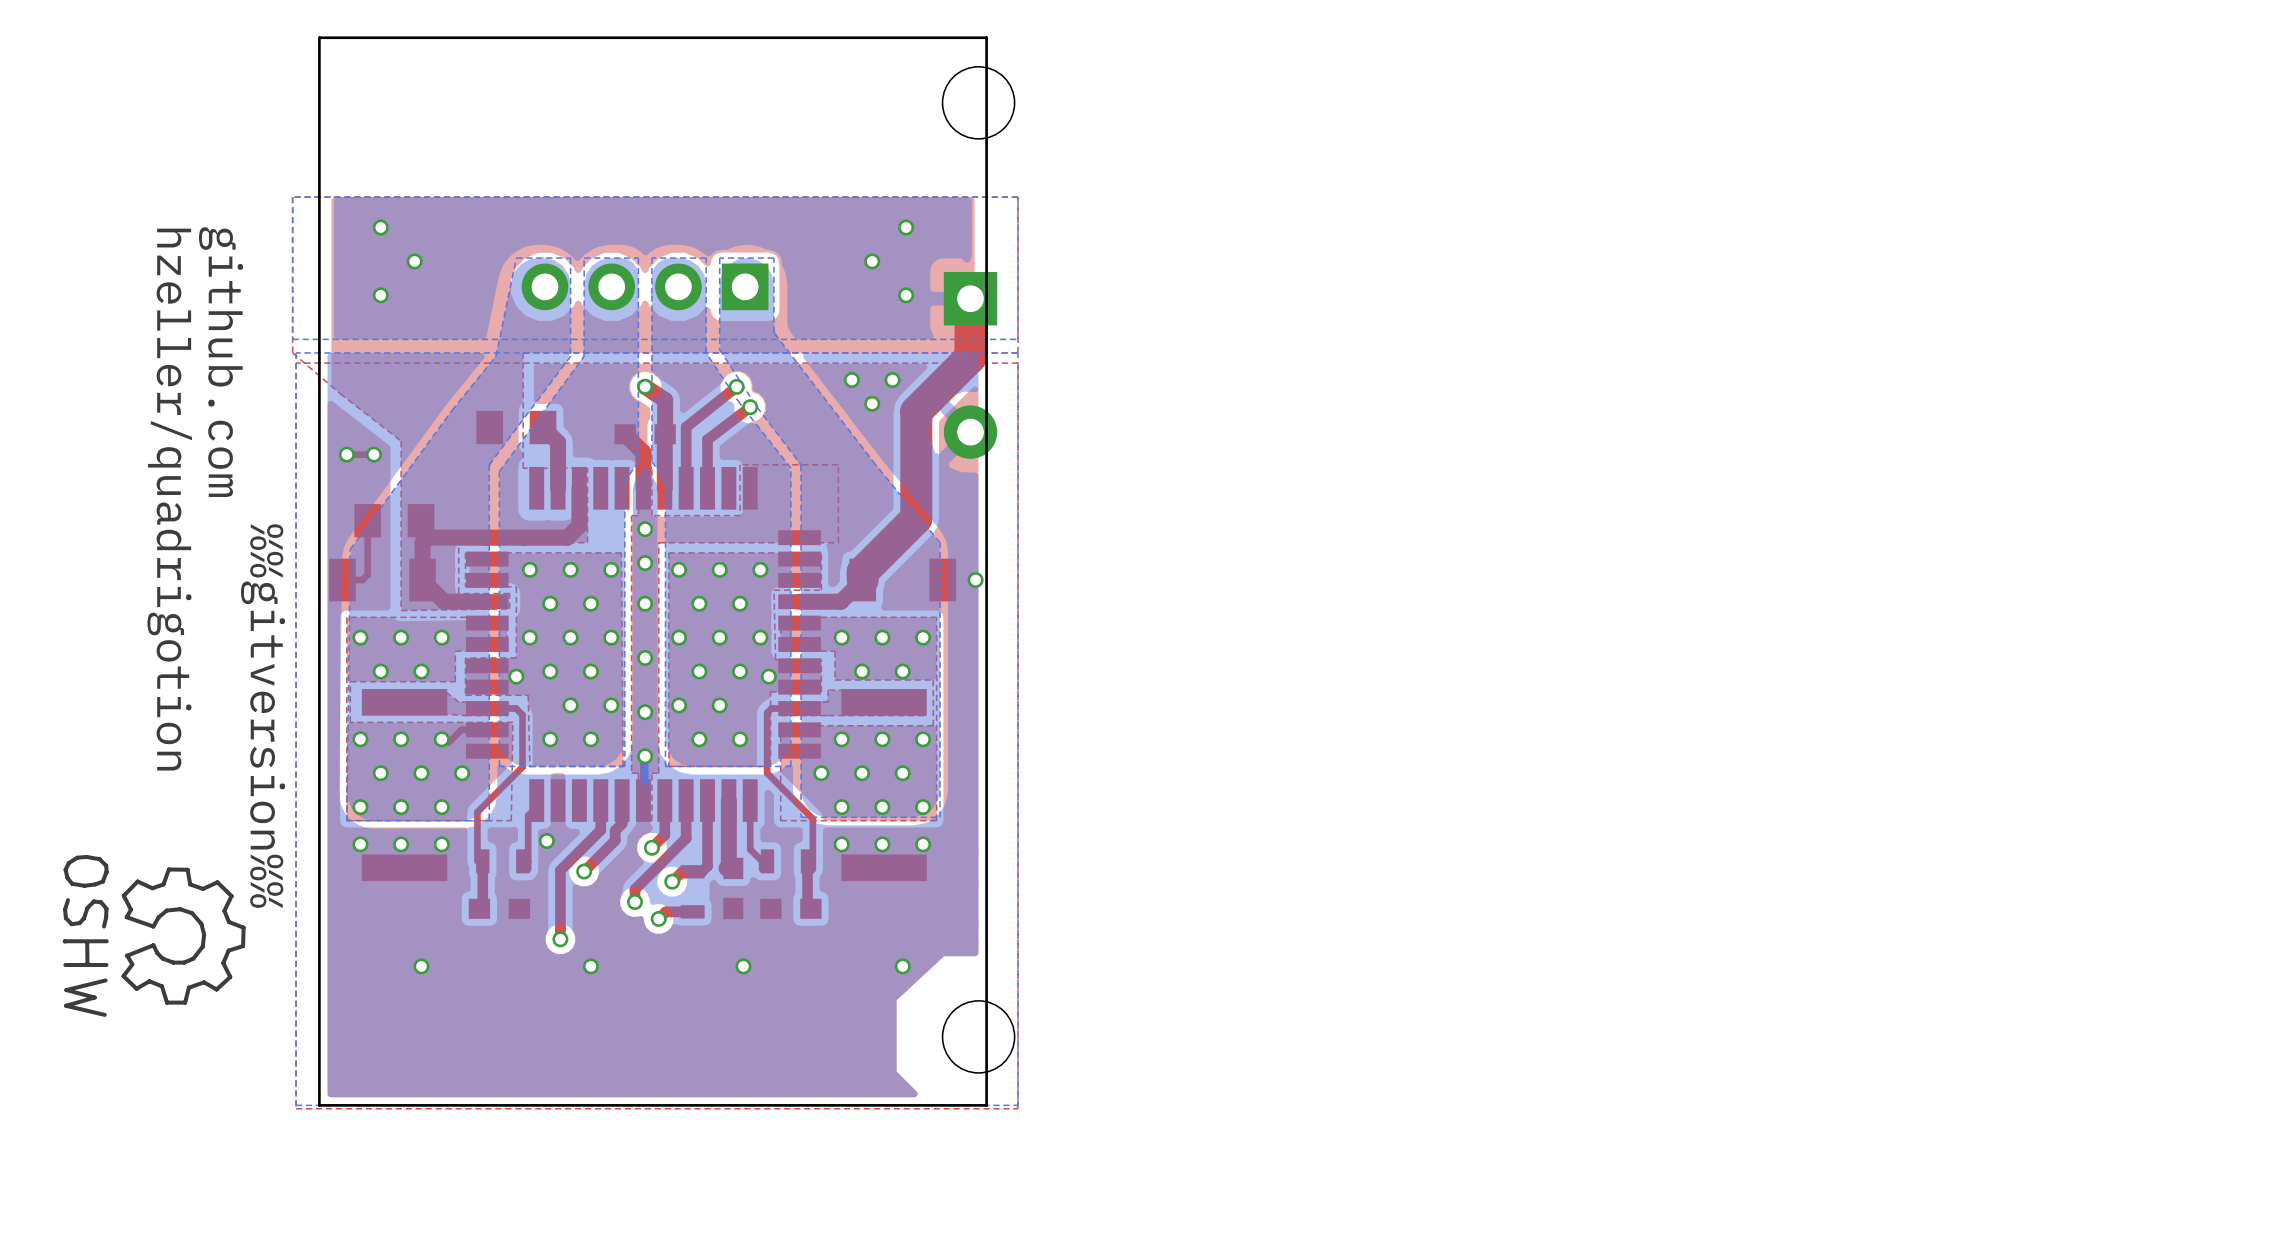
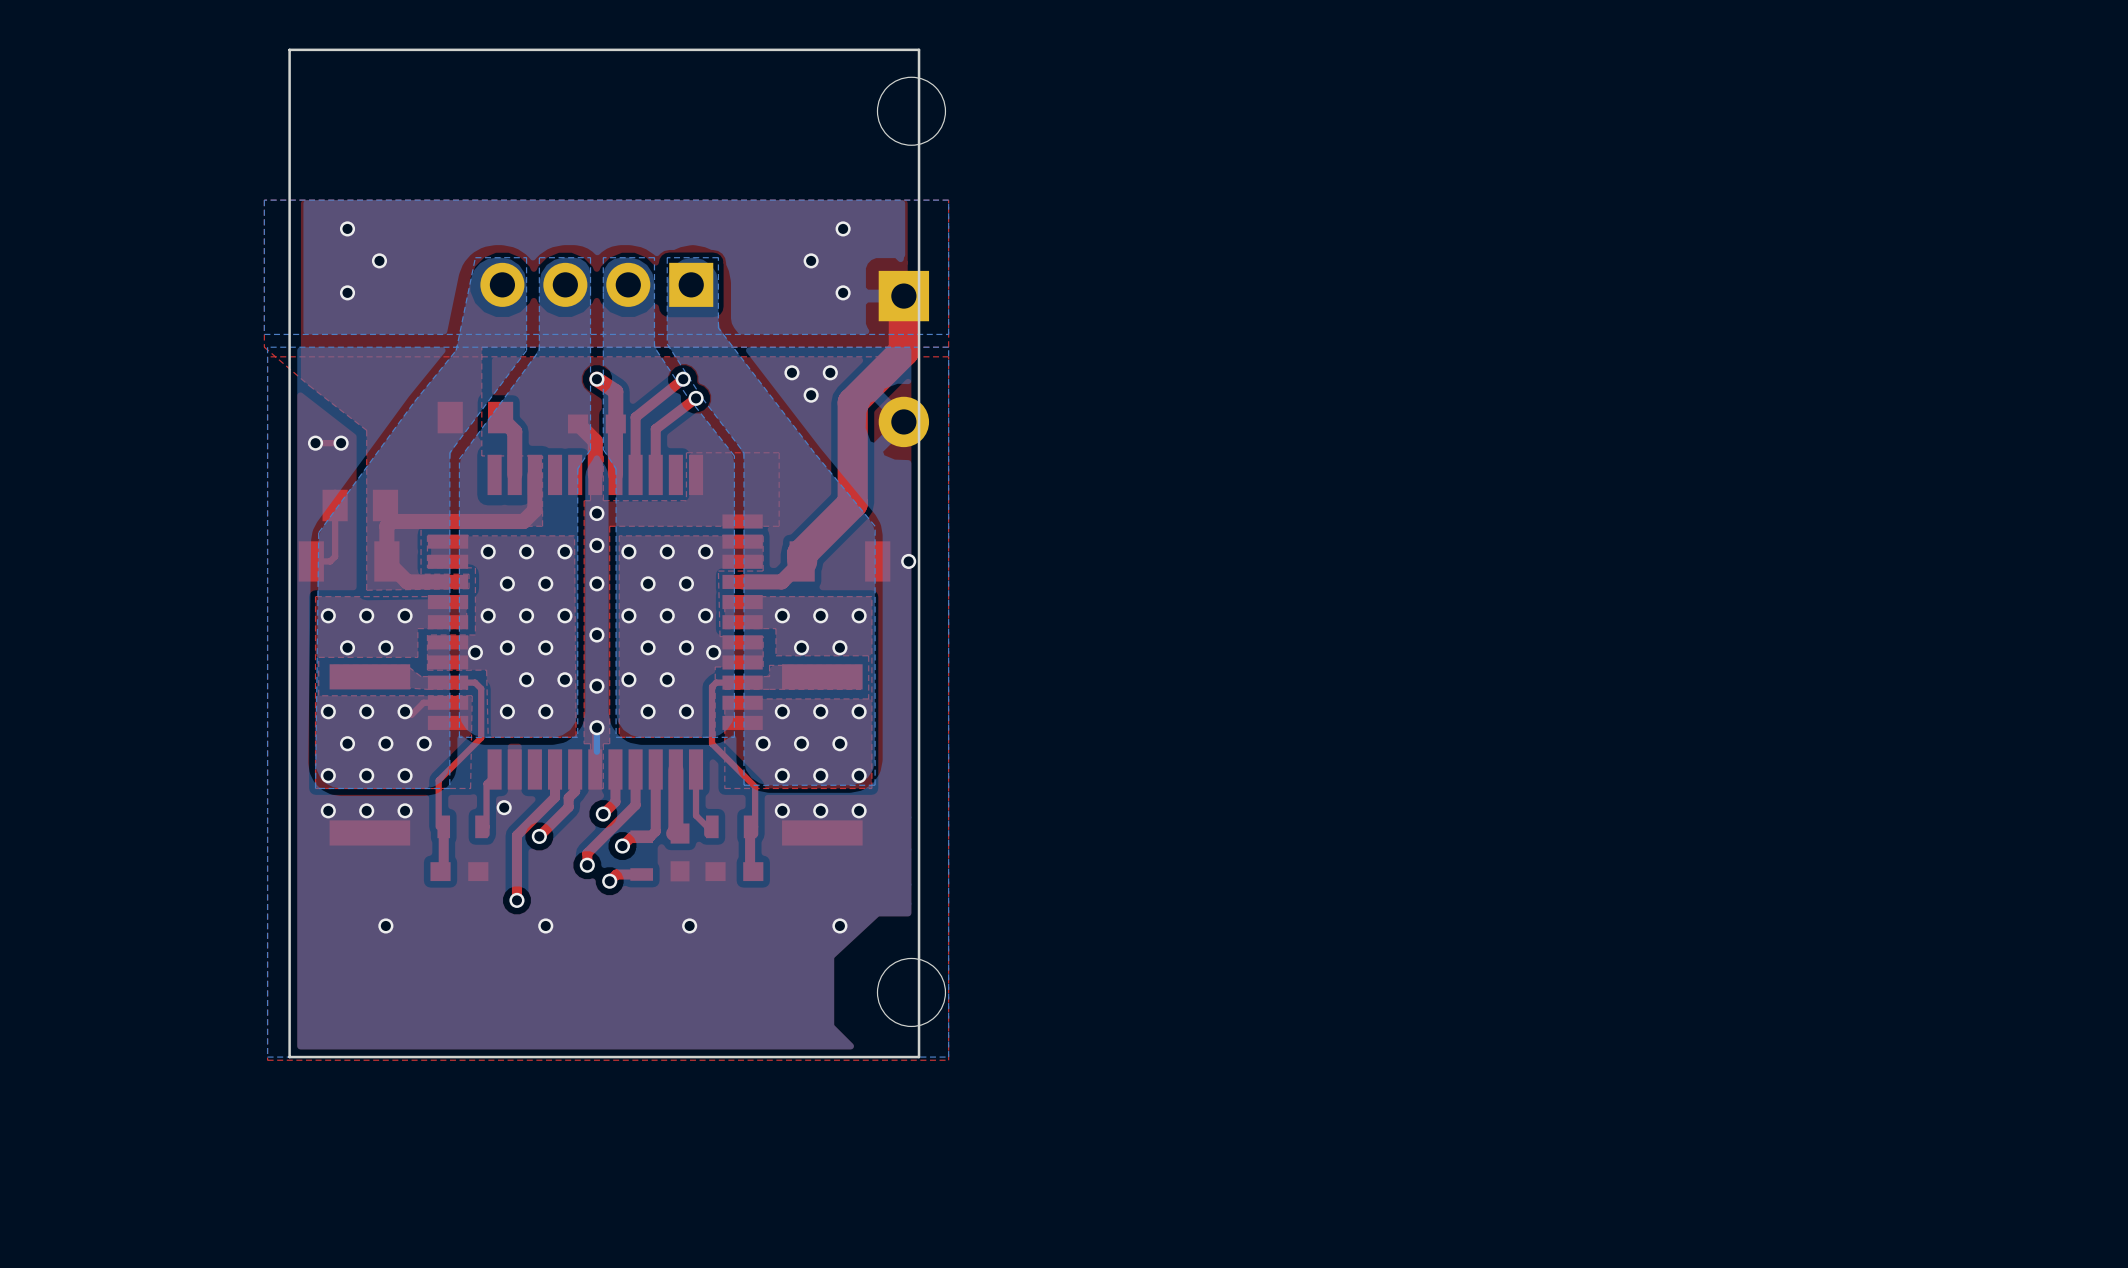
text: github.com (221, 362) -> none
text: hzeller/quadrigotion (169, 499) -> none
text: %%gitversion%% (263, 716) -> none
drawing: [62, 854, 246, 1017] -> none

